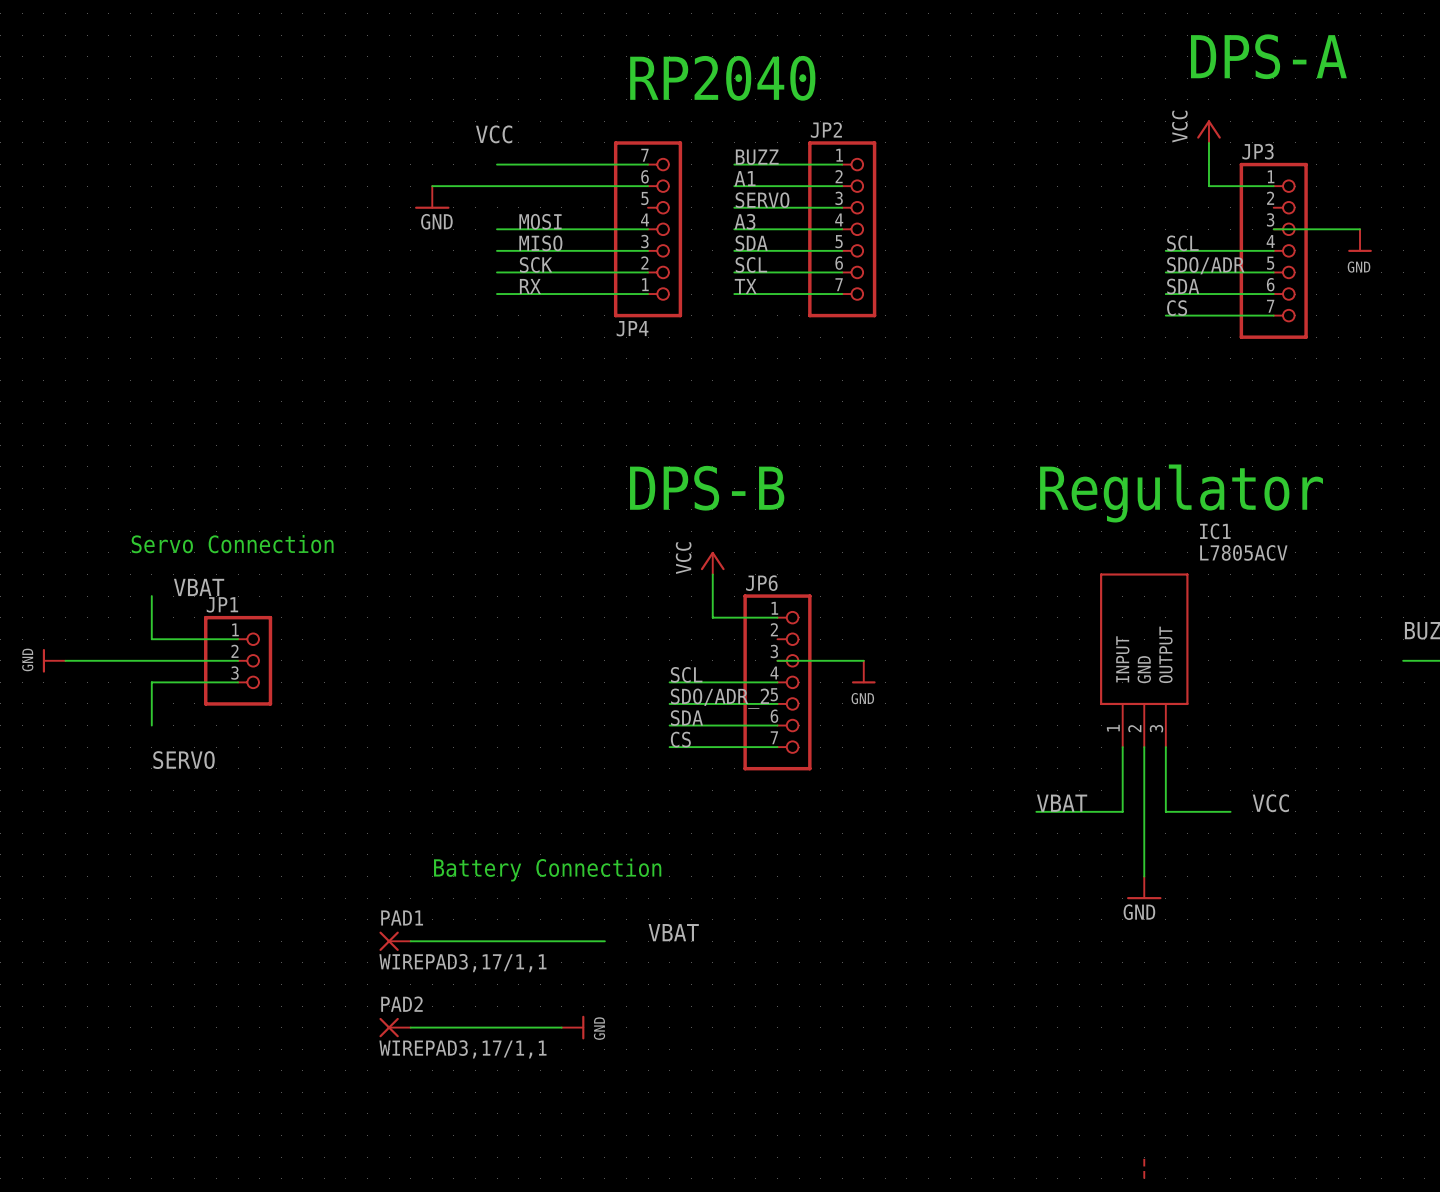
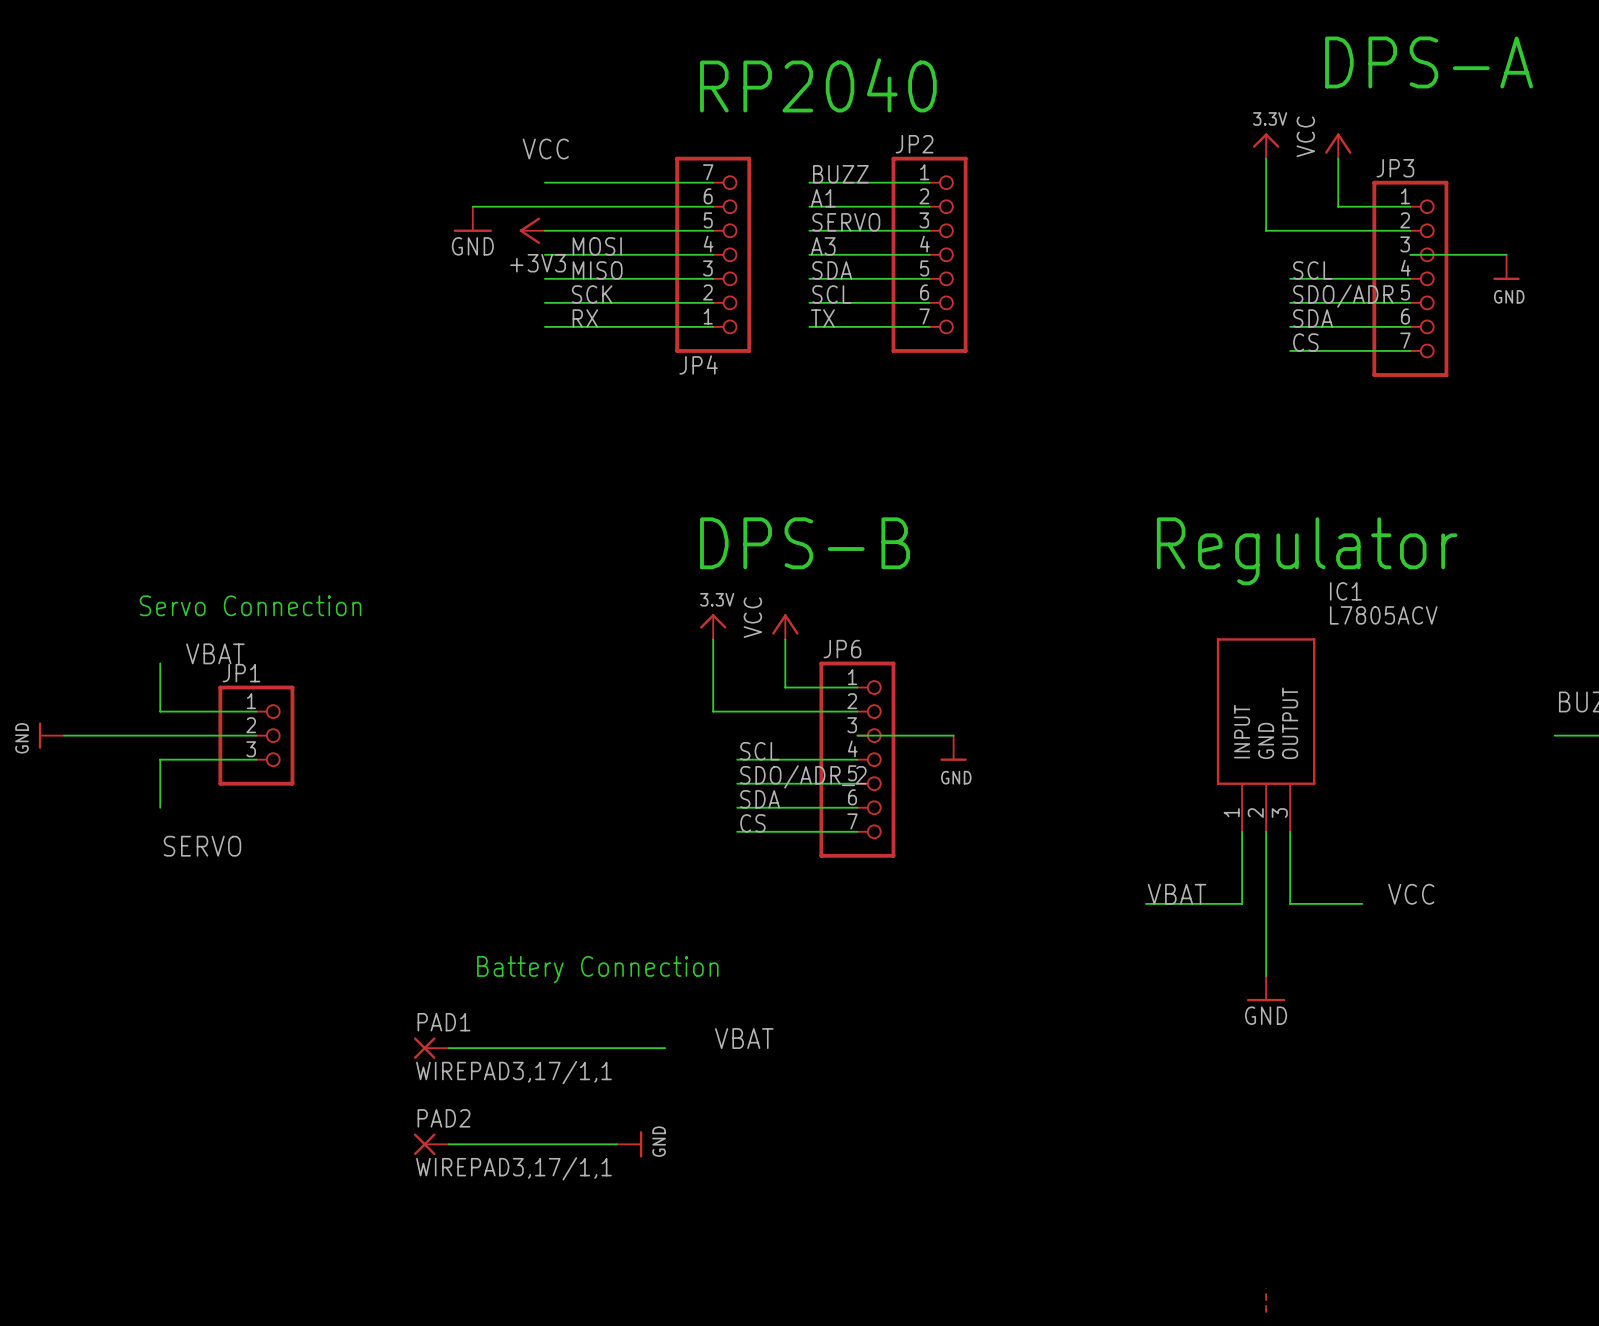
power symbol: none -> 3.3V (1266, 146)
wire: none -> (1266, 158) (1266, 230) (1410, 230)
power symbol: none -> +3V3 (532, 230)
wire: none -> (544, 230) (713, 230)
power symbol: none -> 3.3V (713, 626)
wire: none -> (713, 639) (713, 711) (857, 711)

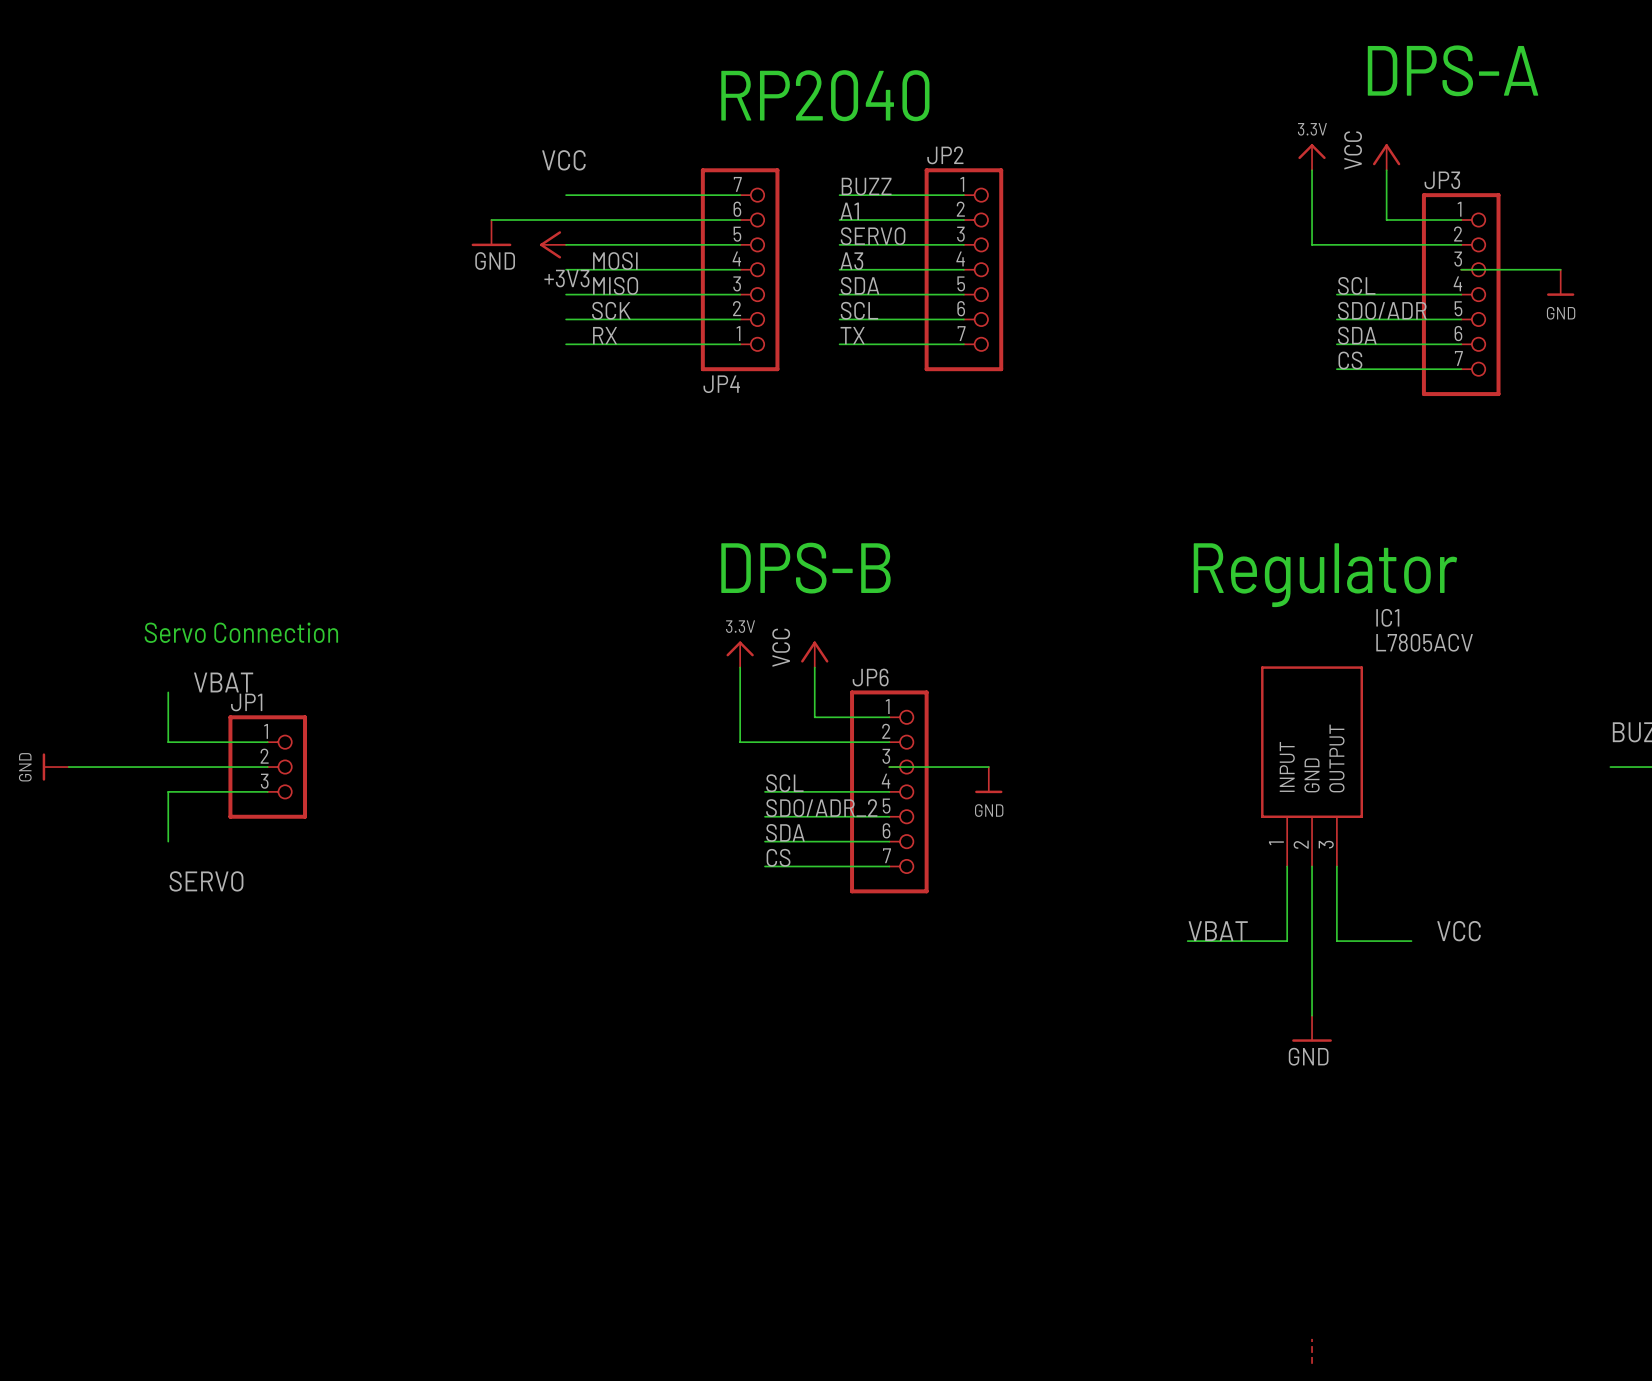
text: Battery Connection (597, 969) -> none
label: VBAT (744, 1038) -> none
PAD1: WIREPAD3,17/1,1 (431, 1048) -> none
wire: (448, 1048) (665, 1048) -> none
PAD2: WIREPAD3,17/1,1 (431, 1144) -> none
wire: (448, 1144) (617, 1144) -> none
power symbol: GND (629, 1144) -> none

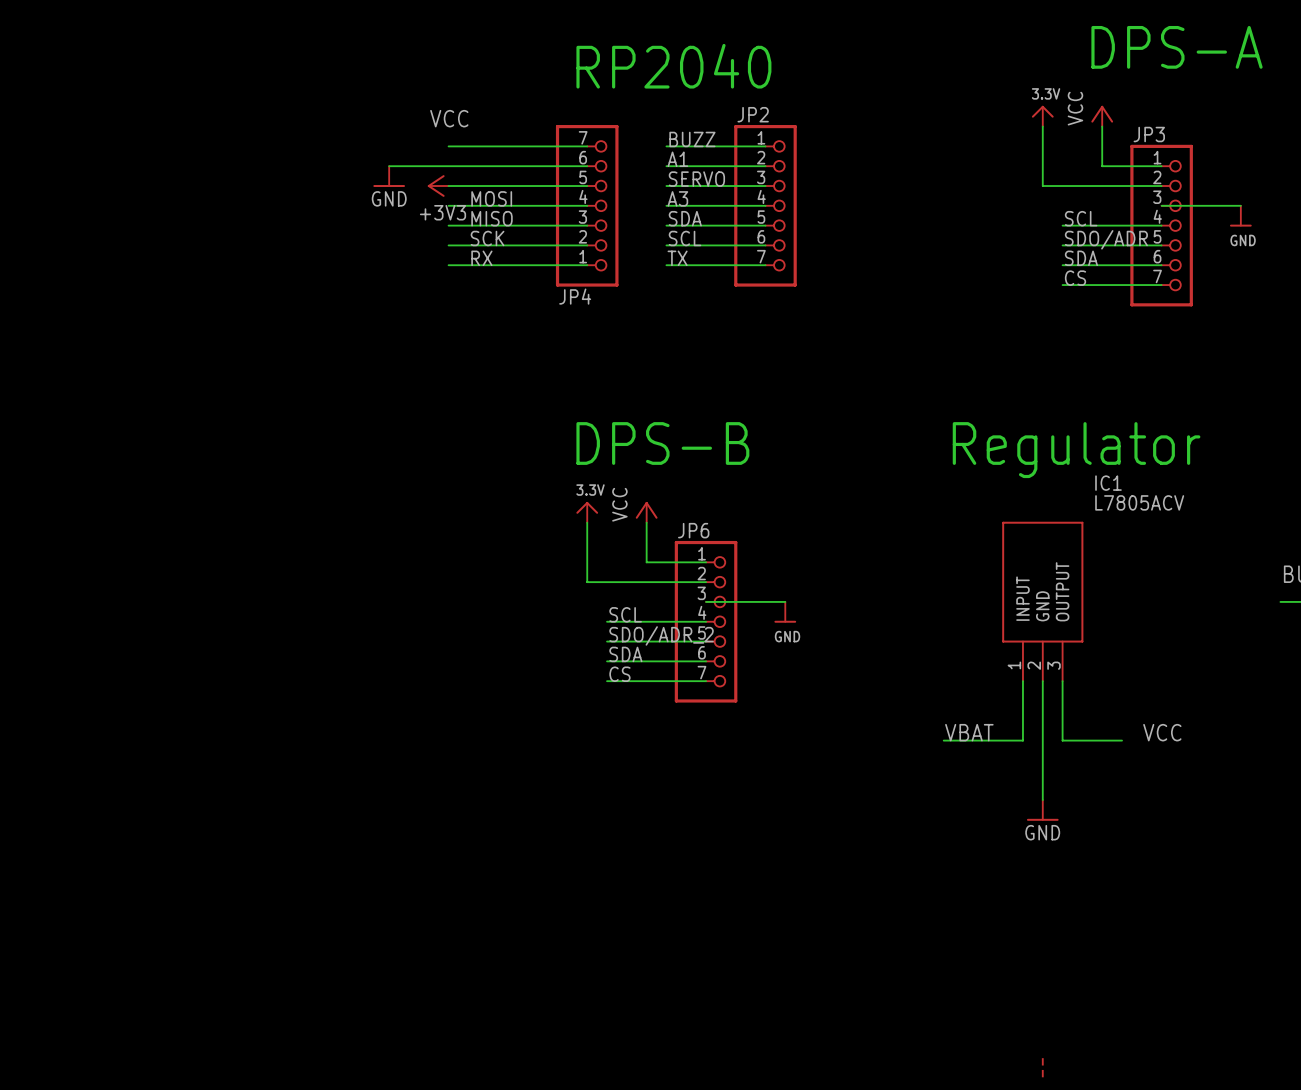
text: Servo Connection (241, 632) -> none
label: VBAT (223, 682) -> none
wire: (168, 692) (168, 742) (267, 742) -> none
power symbol: GND (55, 767) -> none
wire: (68, 767) (267, 767) -> none
JP1: (267, 767) -> none
wire: (267, 791) (168, 791) (168, 841) -> none
label: SERVO (206, 881) -> none

